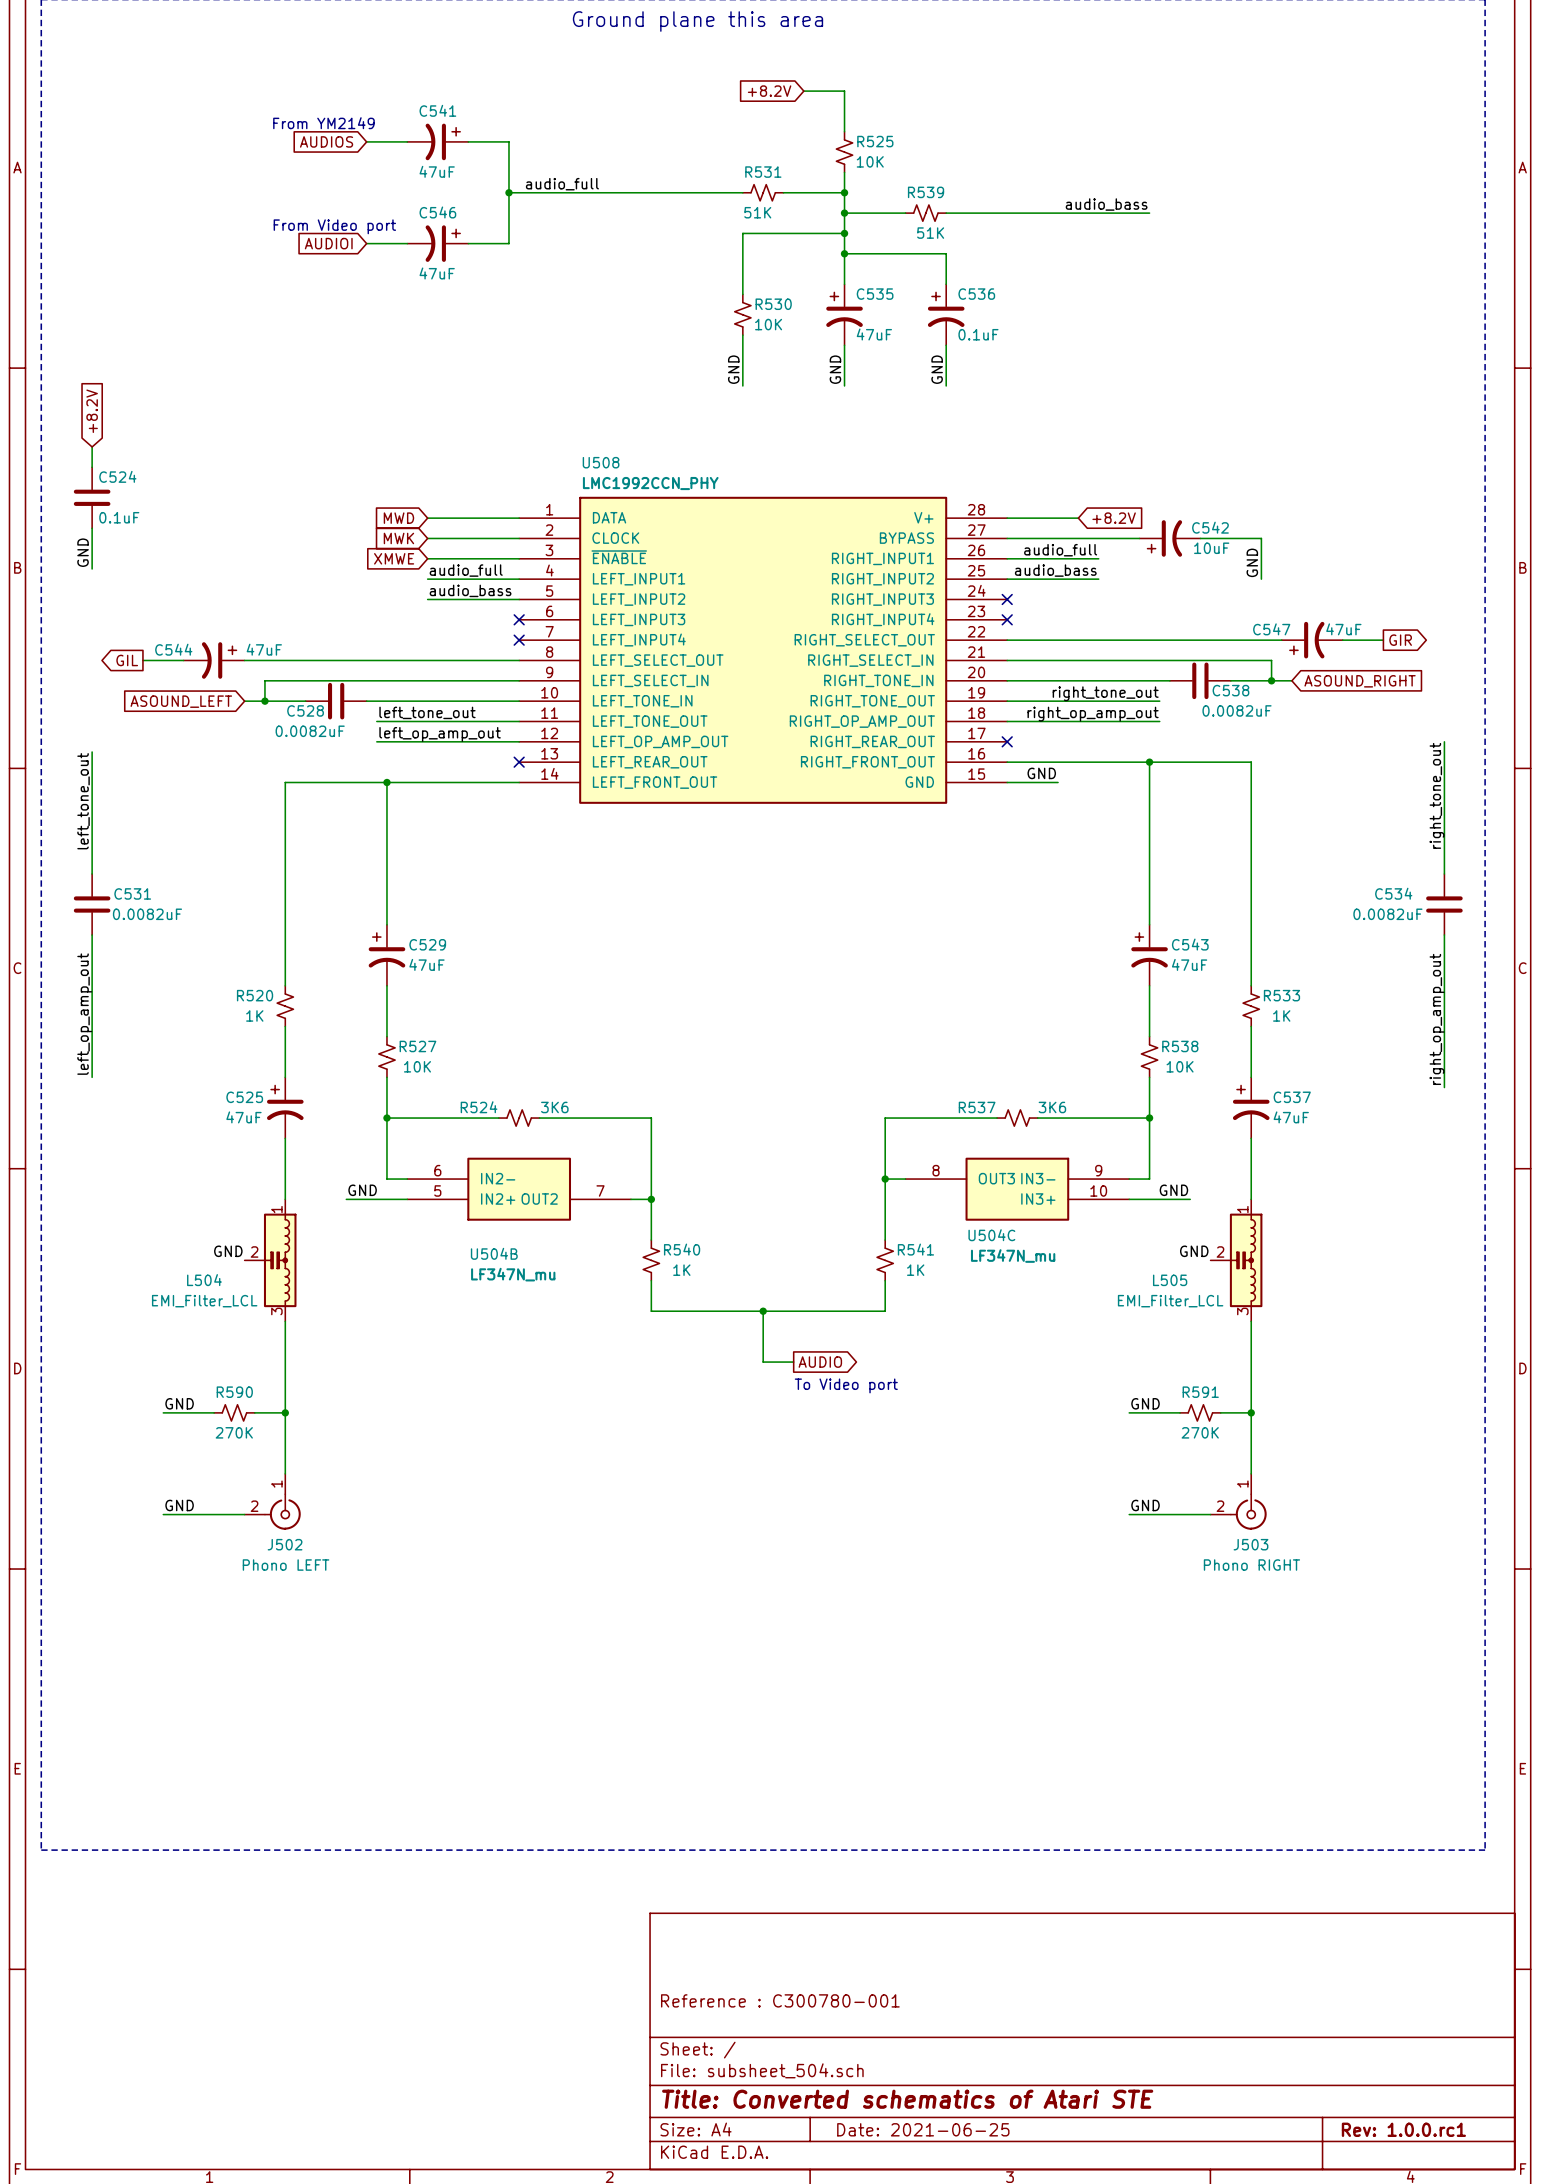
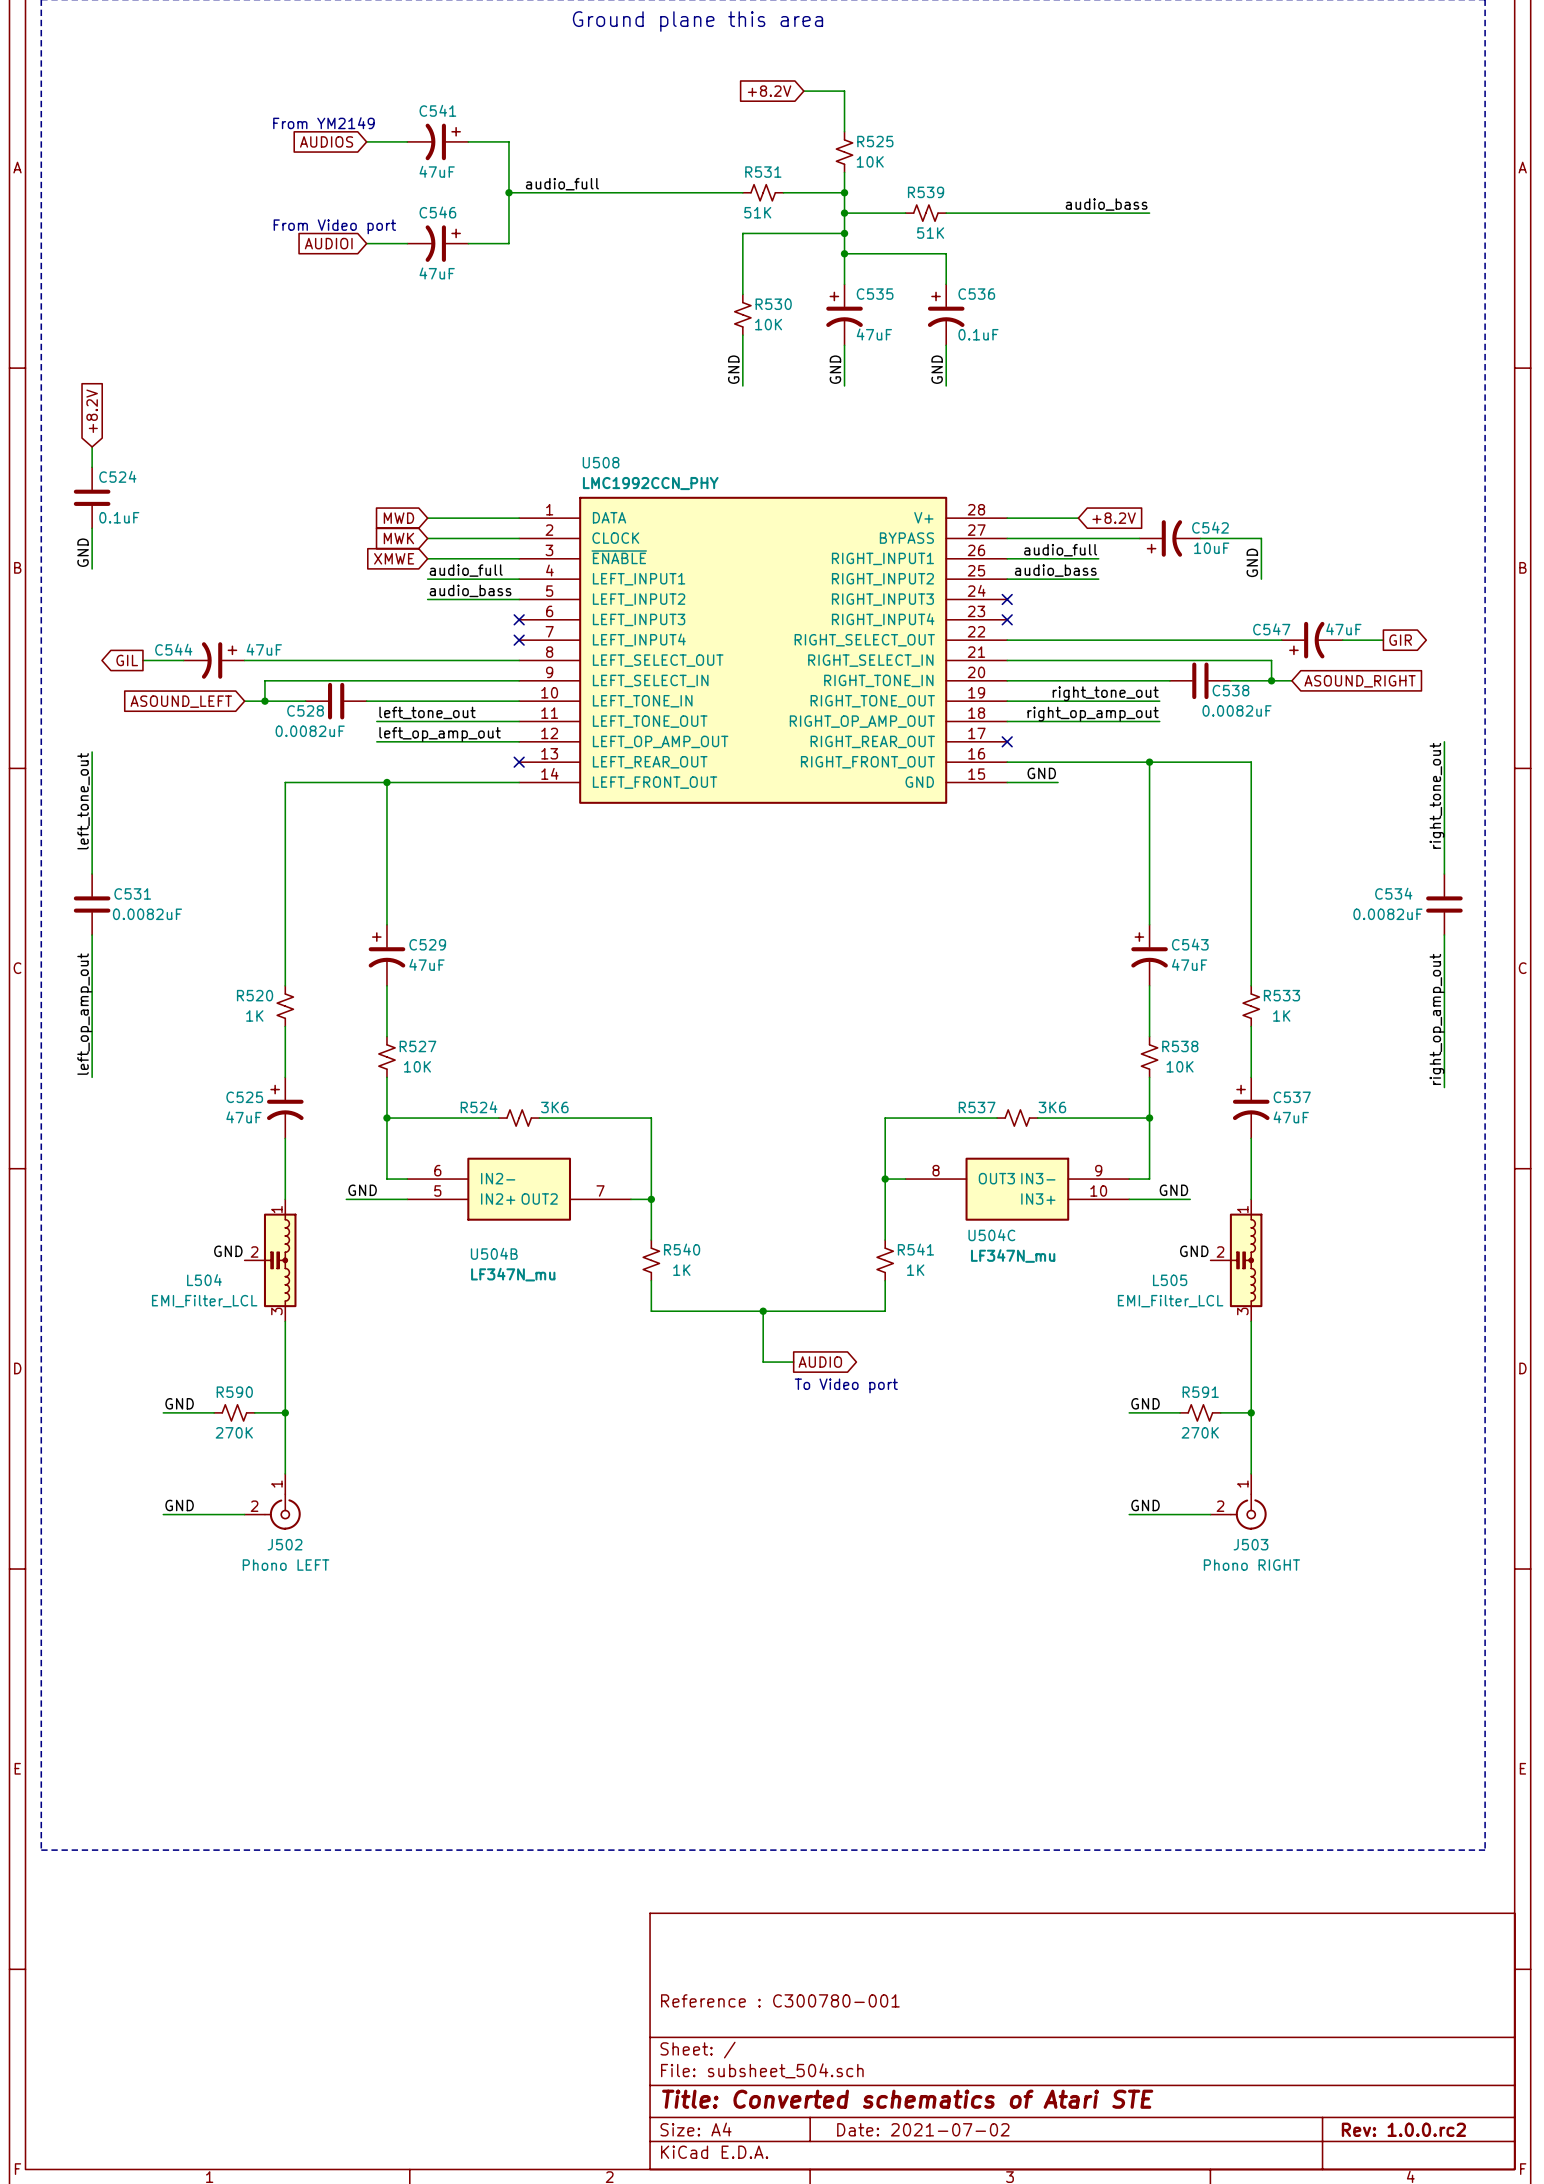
title block: Date: 2021-06-25 (923, 2129) -> Date: 2021-07-02 (923, 2129)
title block: Rev: 1.0.0.rc1 (1403, 2129) -> Rev: 1.0.0.rc2 (1403, 2129)

